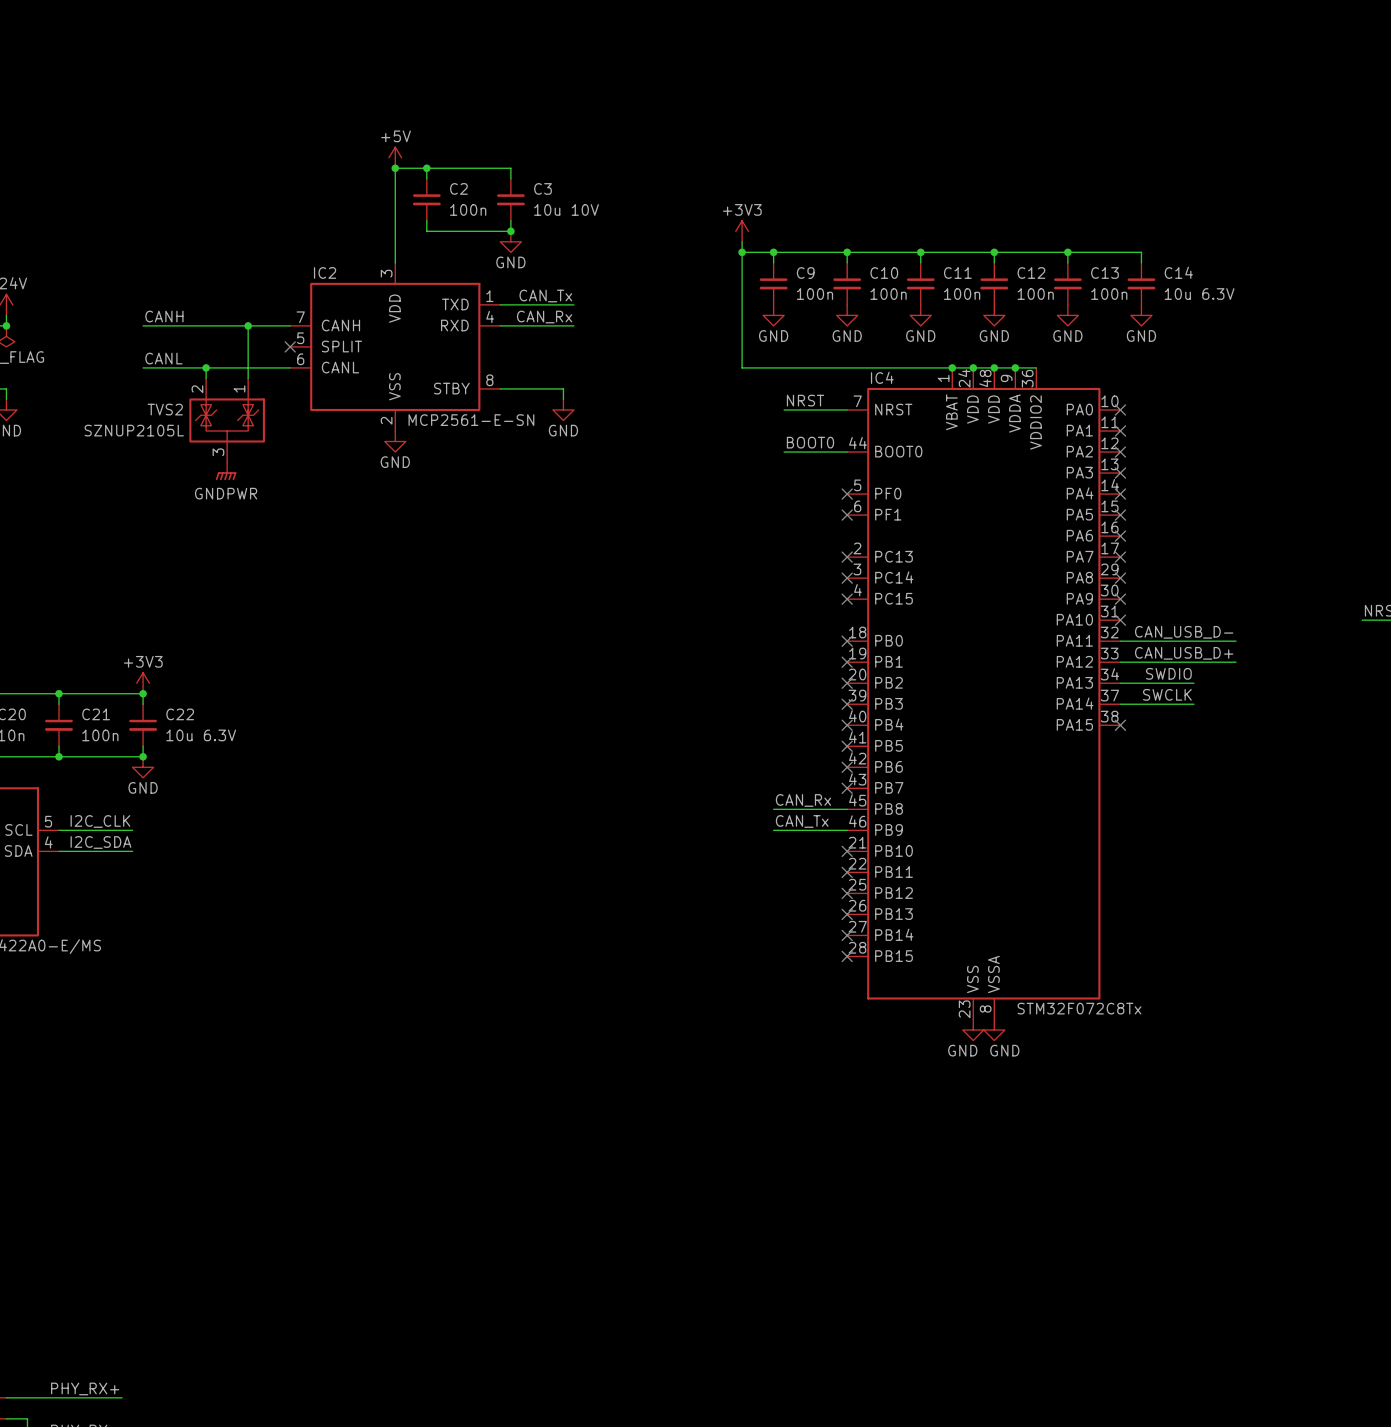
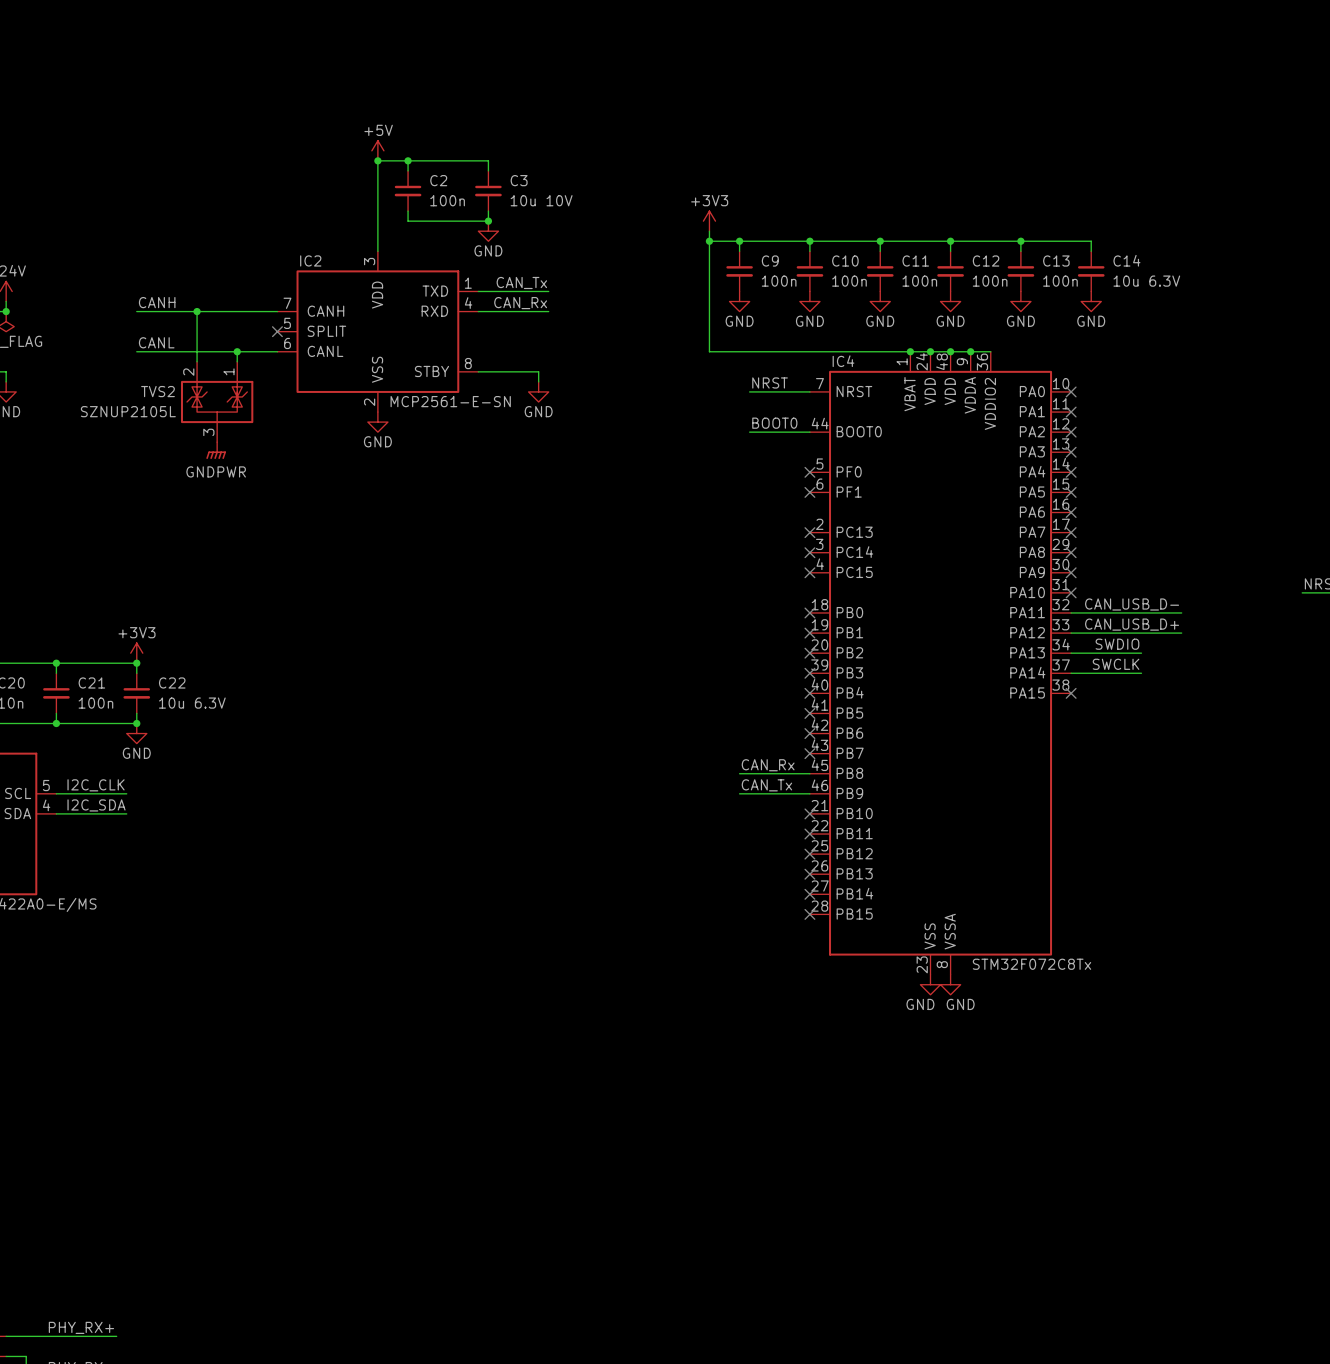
junction: none -> (197, 311)
wire: (248, 325) (248, 367) -> (197, 311) (197, 351)
junction: (248, 325) -> none
junction: (206, 367) -> none
junction: none -> (237, 351)

